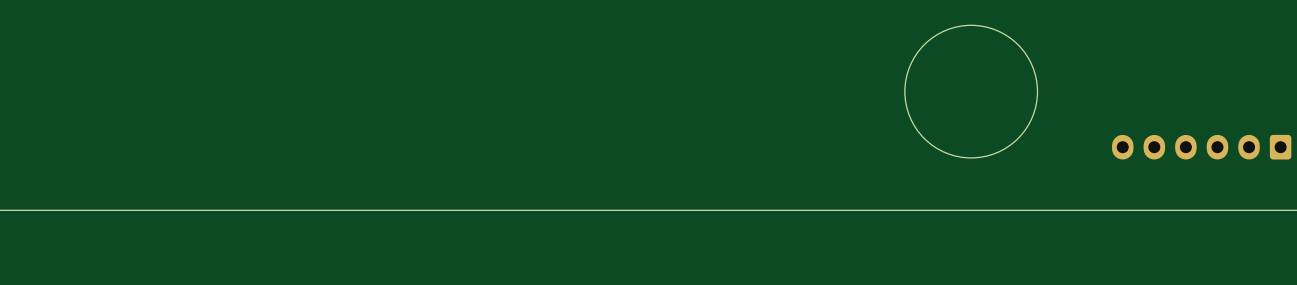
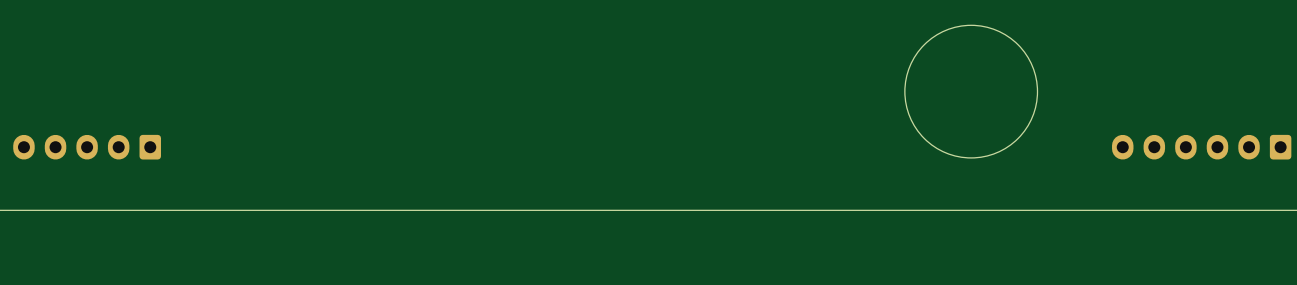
part: none -> (87, 147)

